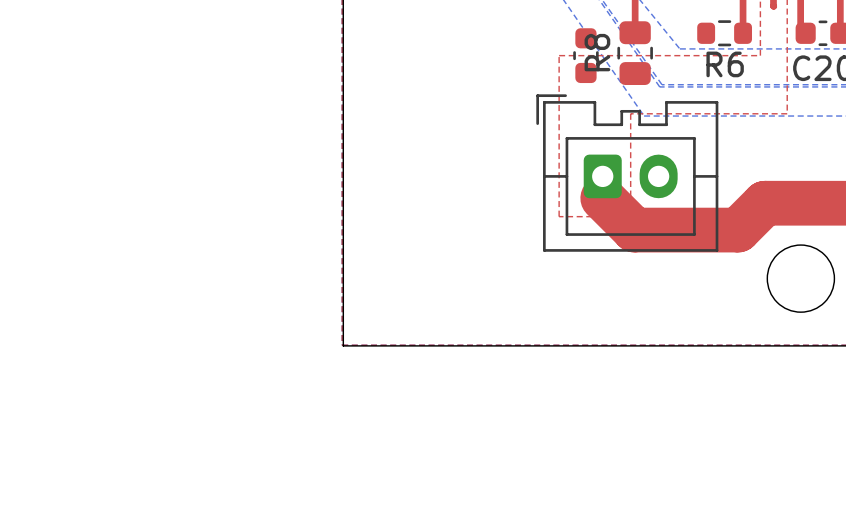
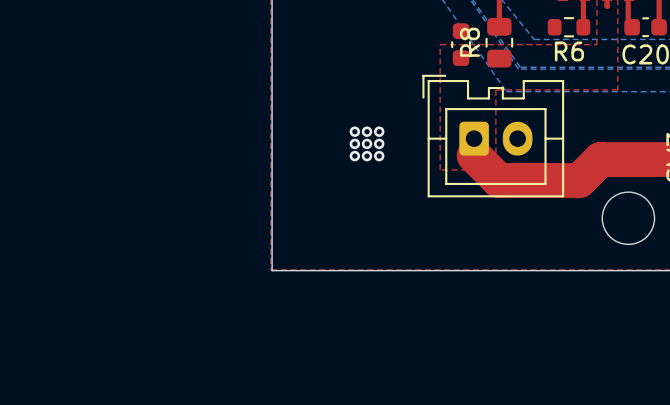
via: none -> (354, 131)
via: none -> (367, 131)
via: none -> (379, 131)
via: none -> (354, 143)
via: none -> (367, 143)
via: none -> (379, 143)
via: none -> (354, 156)
via: none -> (367, 156)
via: none -> (379, 156)

